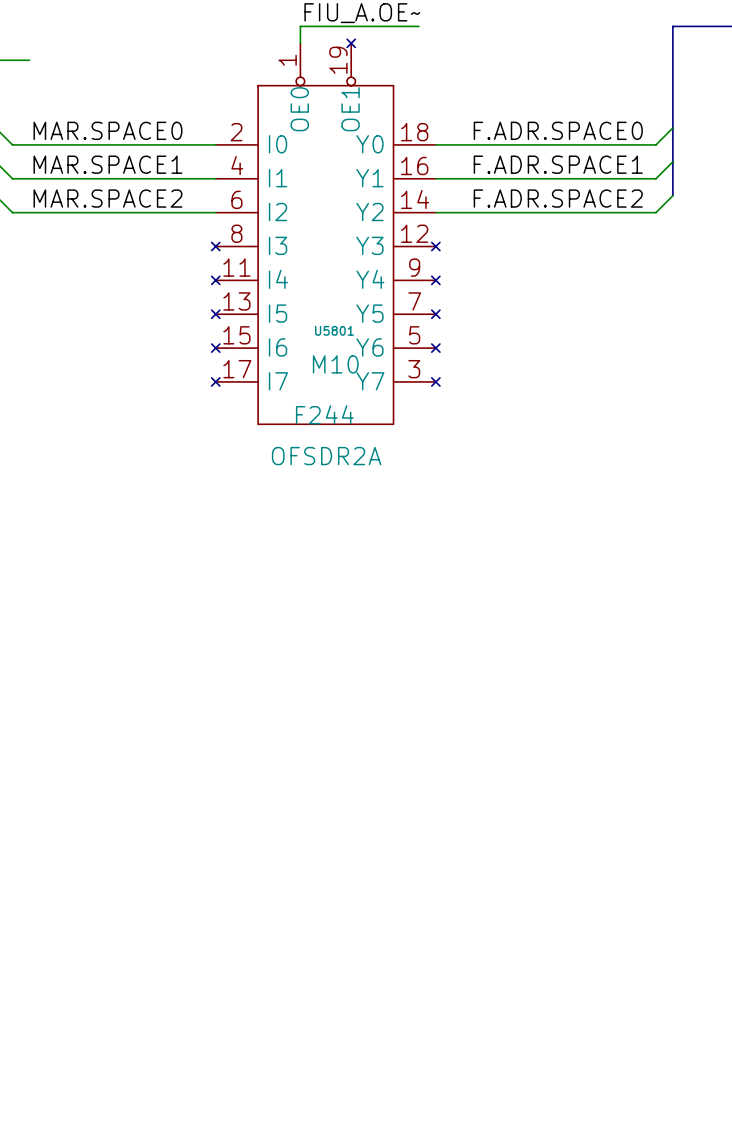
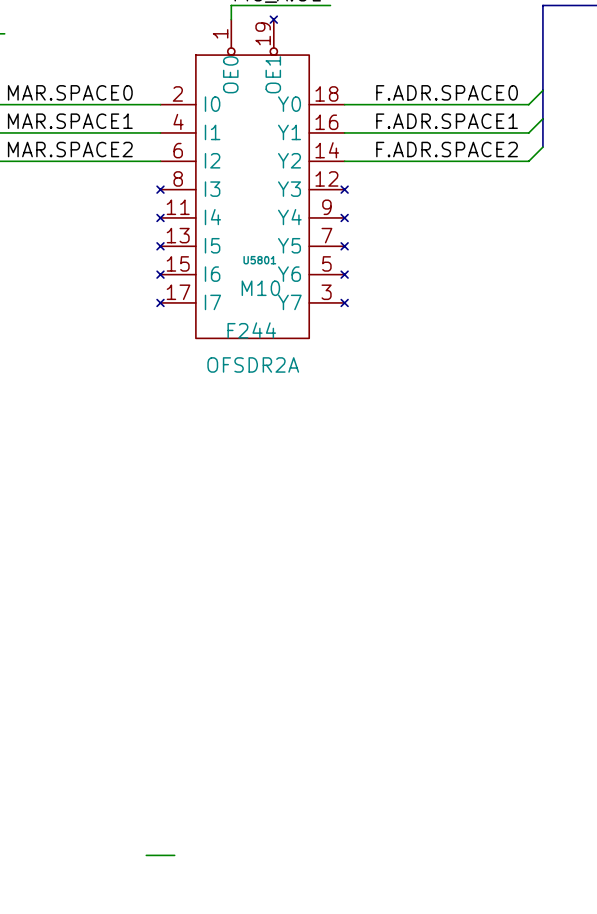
wire: none -> (146, 855) (174, 855)

